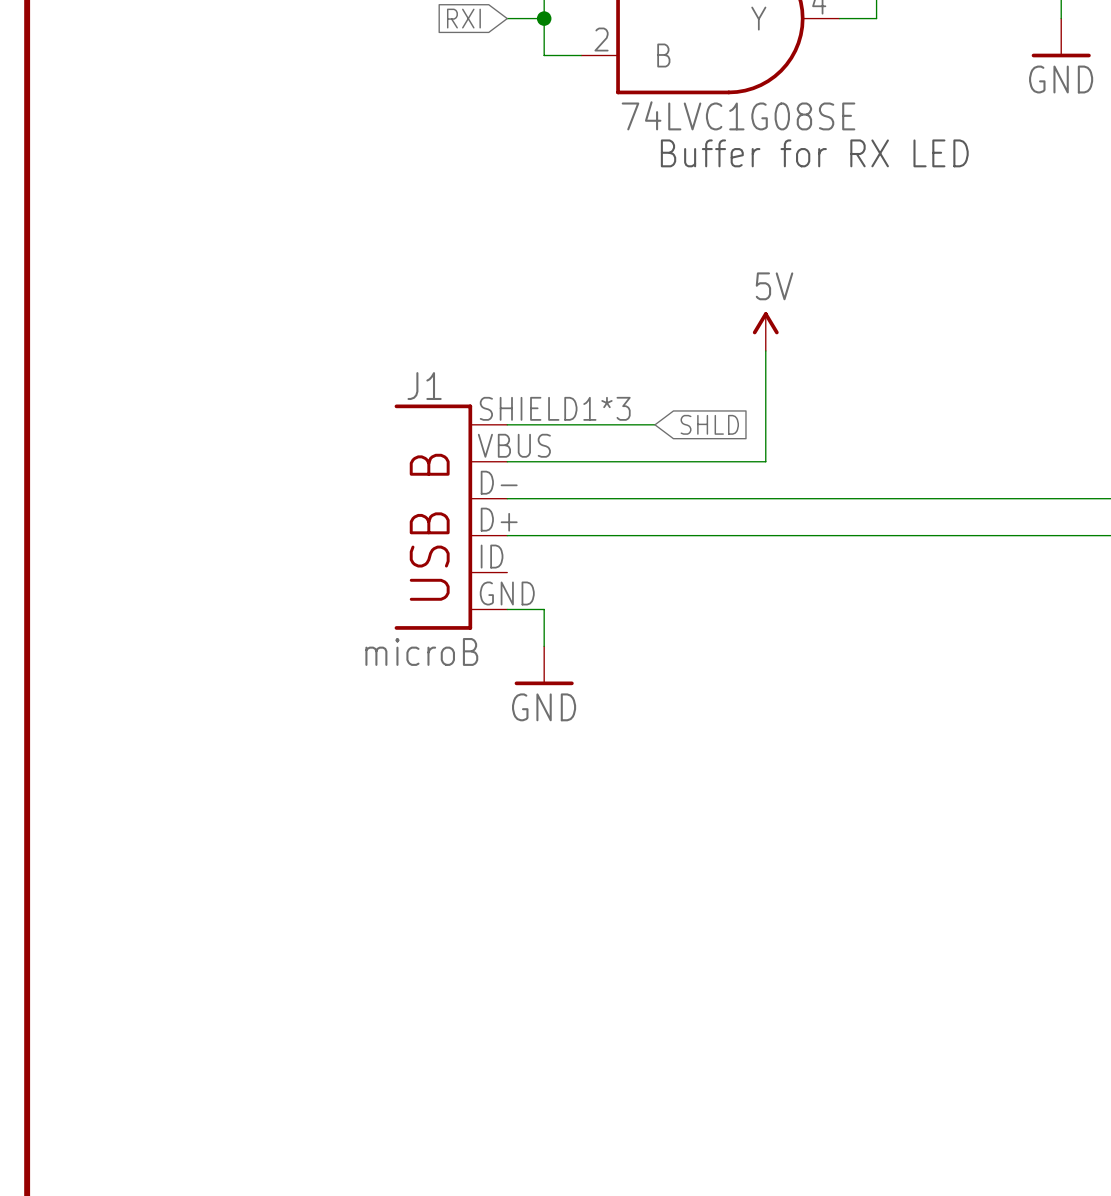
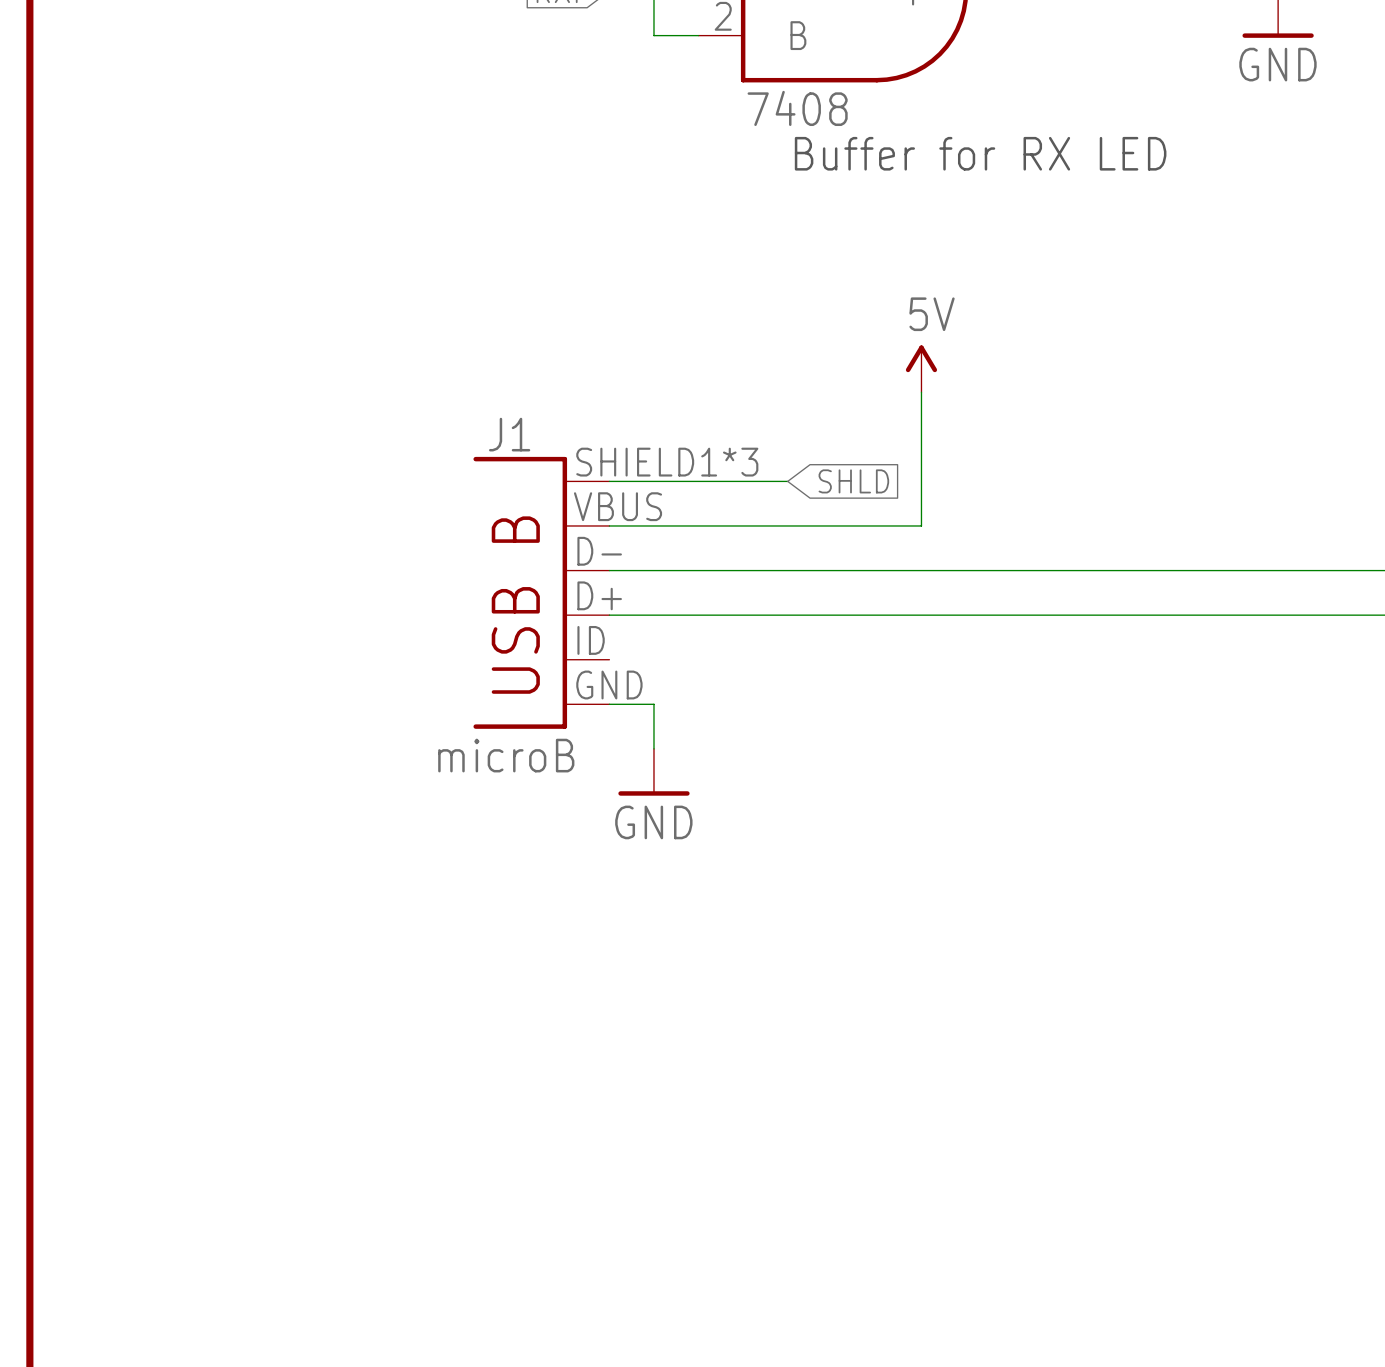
part value: 74LVC1G08SE (738, 115) -> 7408 (797, 108)

